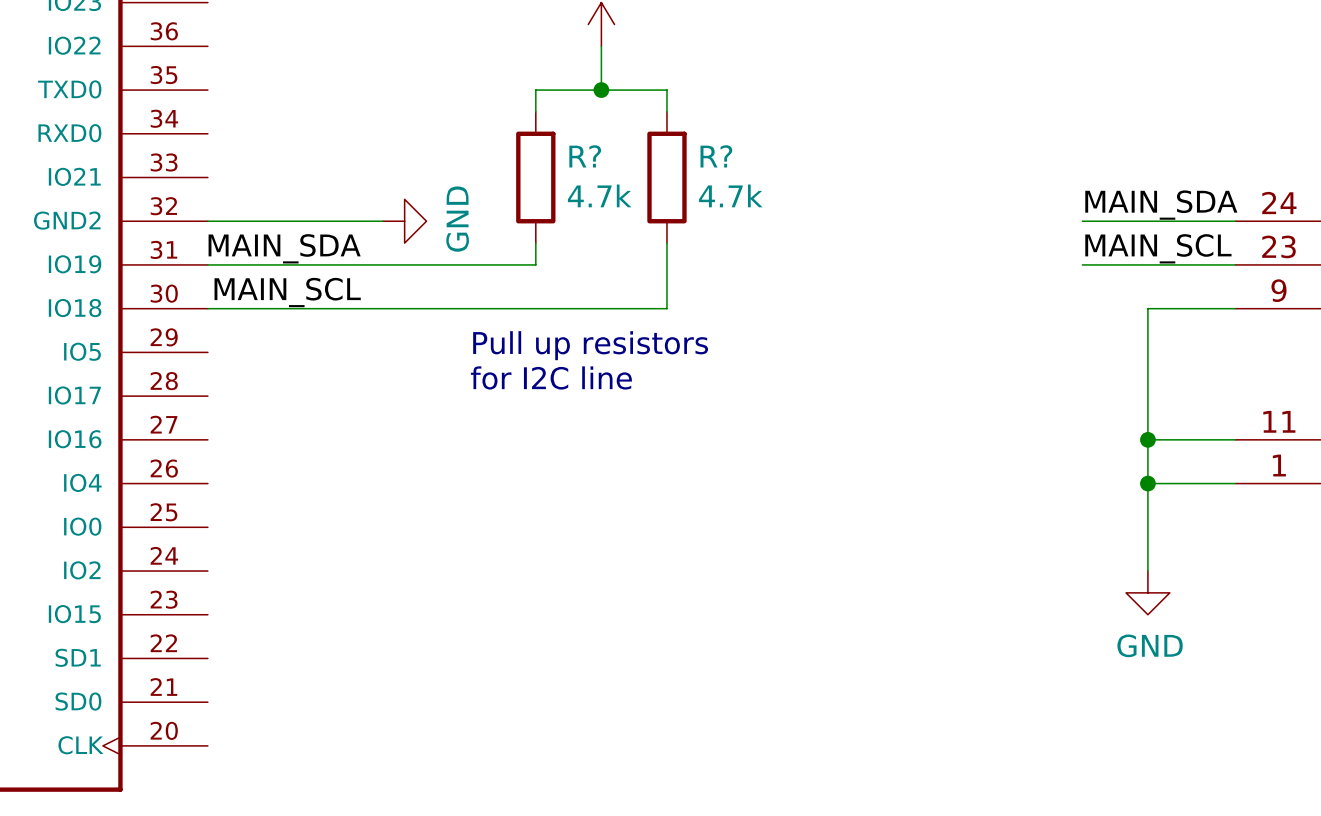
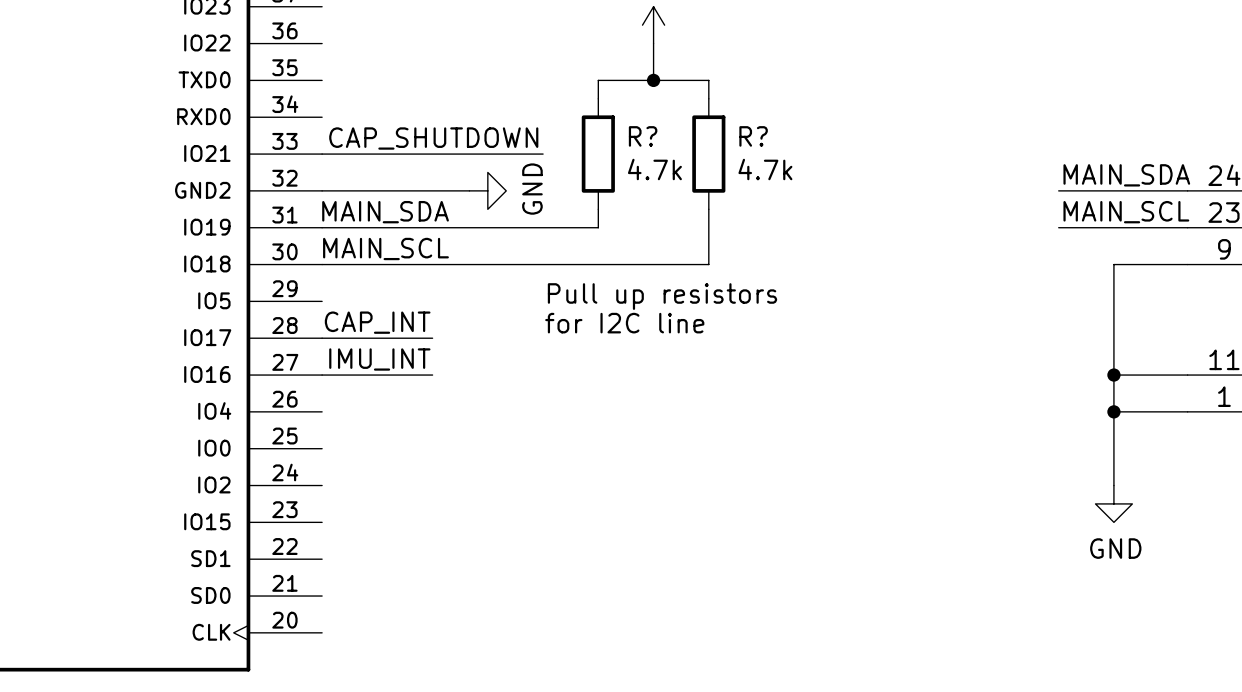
label: none -> CAP_SHUTDOWN (433, 138)
wire: none -> (322, 154) (543, 154)
label: none -> CAP_INT (377, 322)
wire: none -> (322, 338) (432, 338)
label: none -> IMU_INT (379, 359)
wire: none -> (322, 375) (432, 375)

